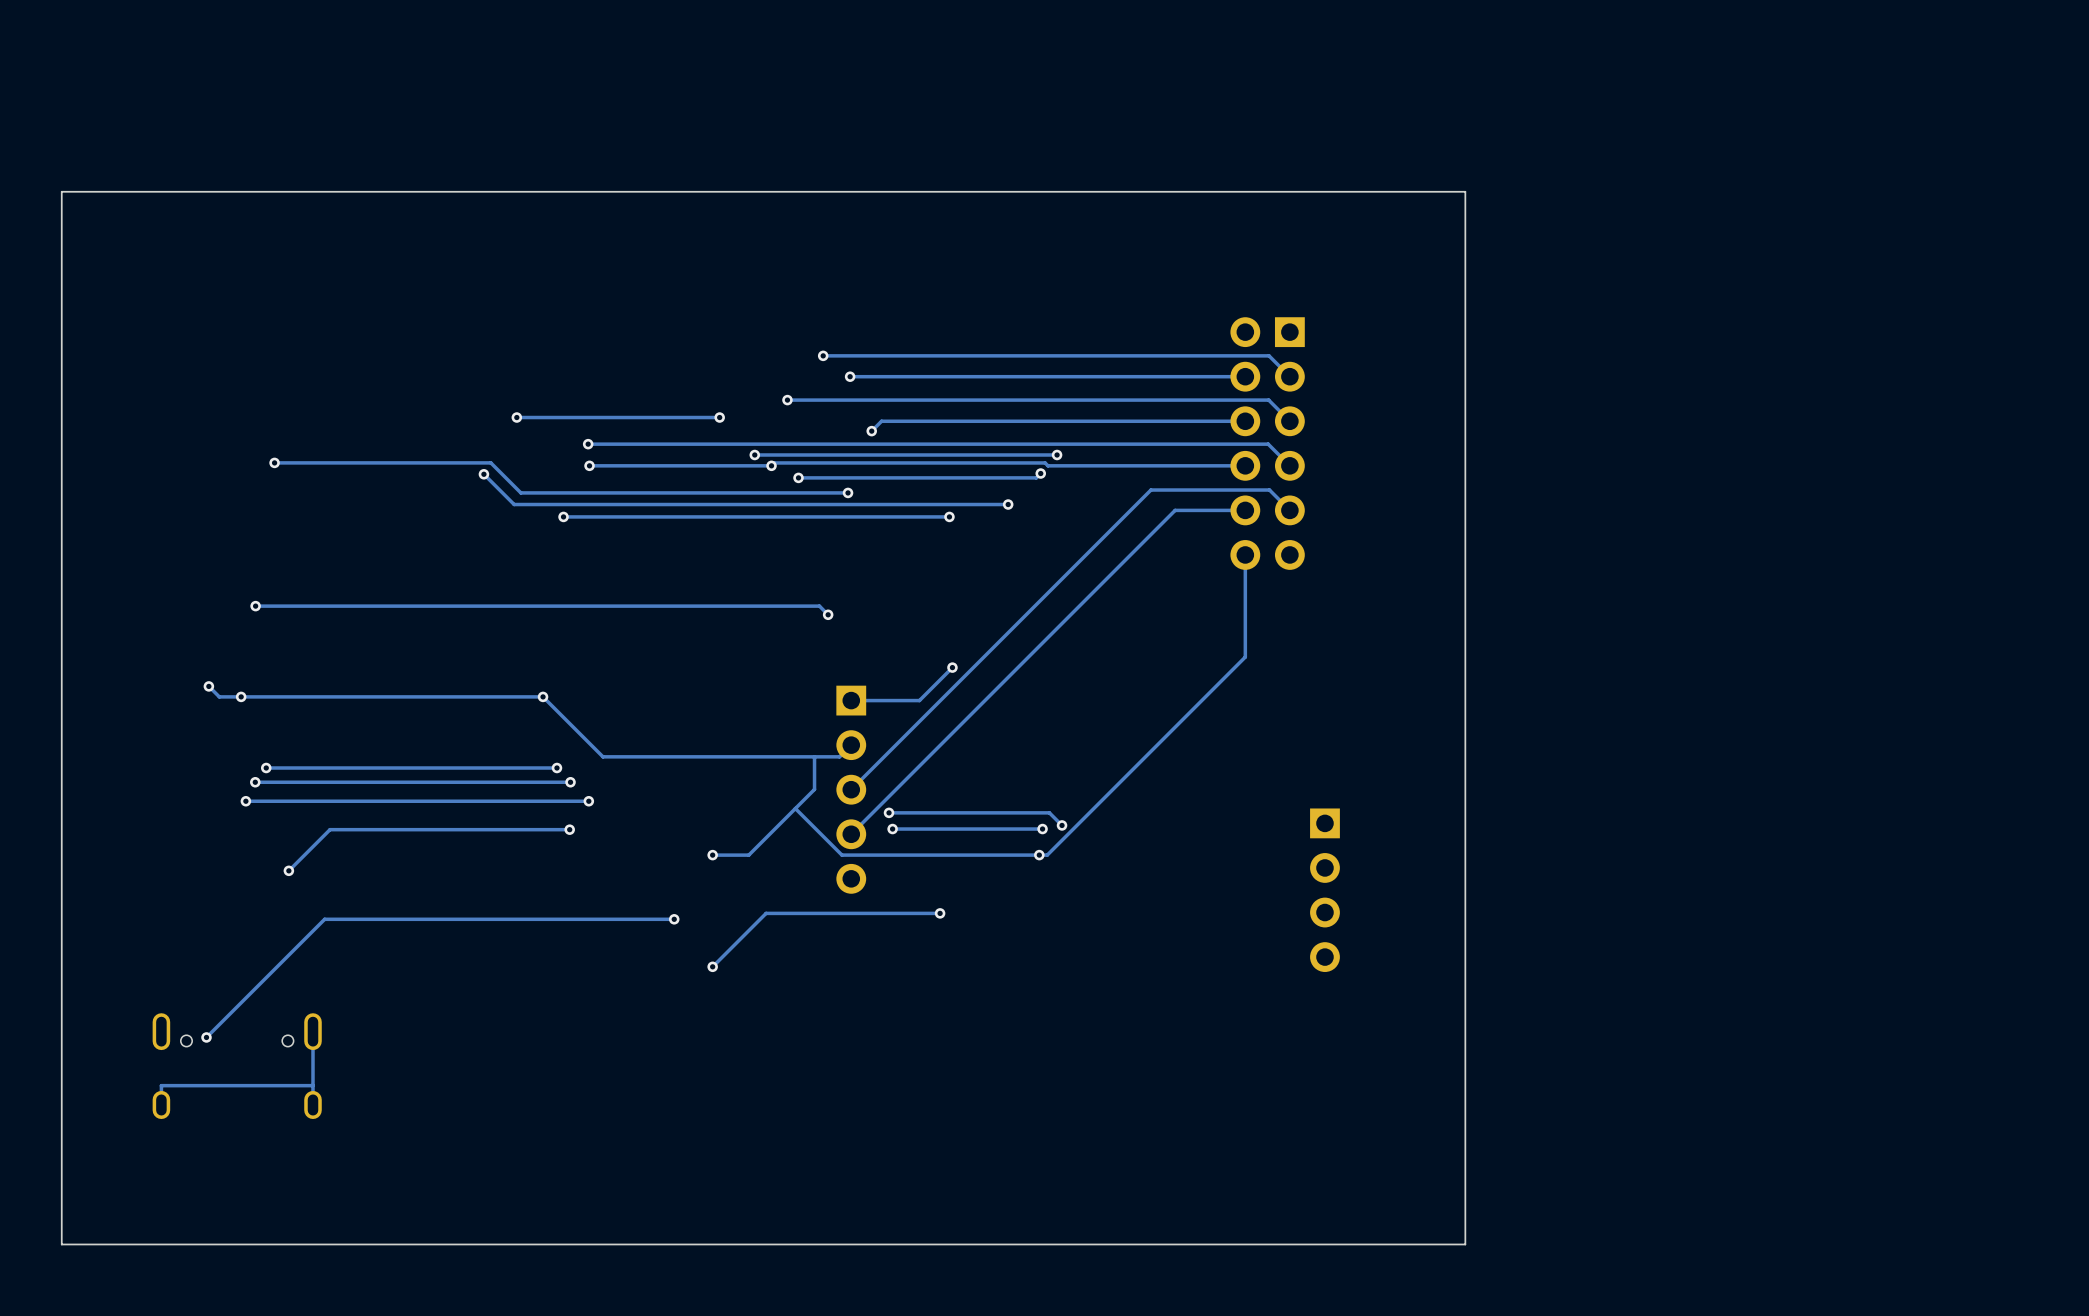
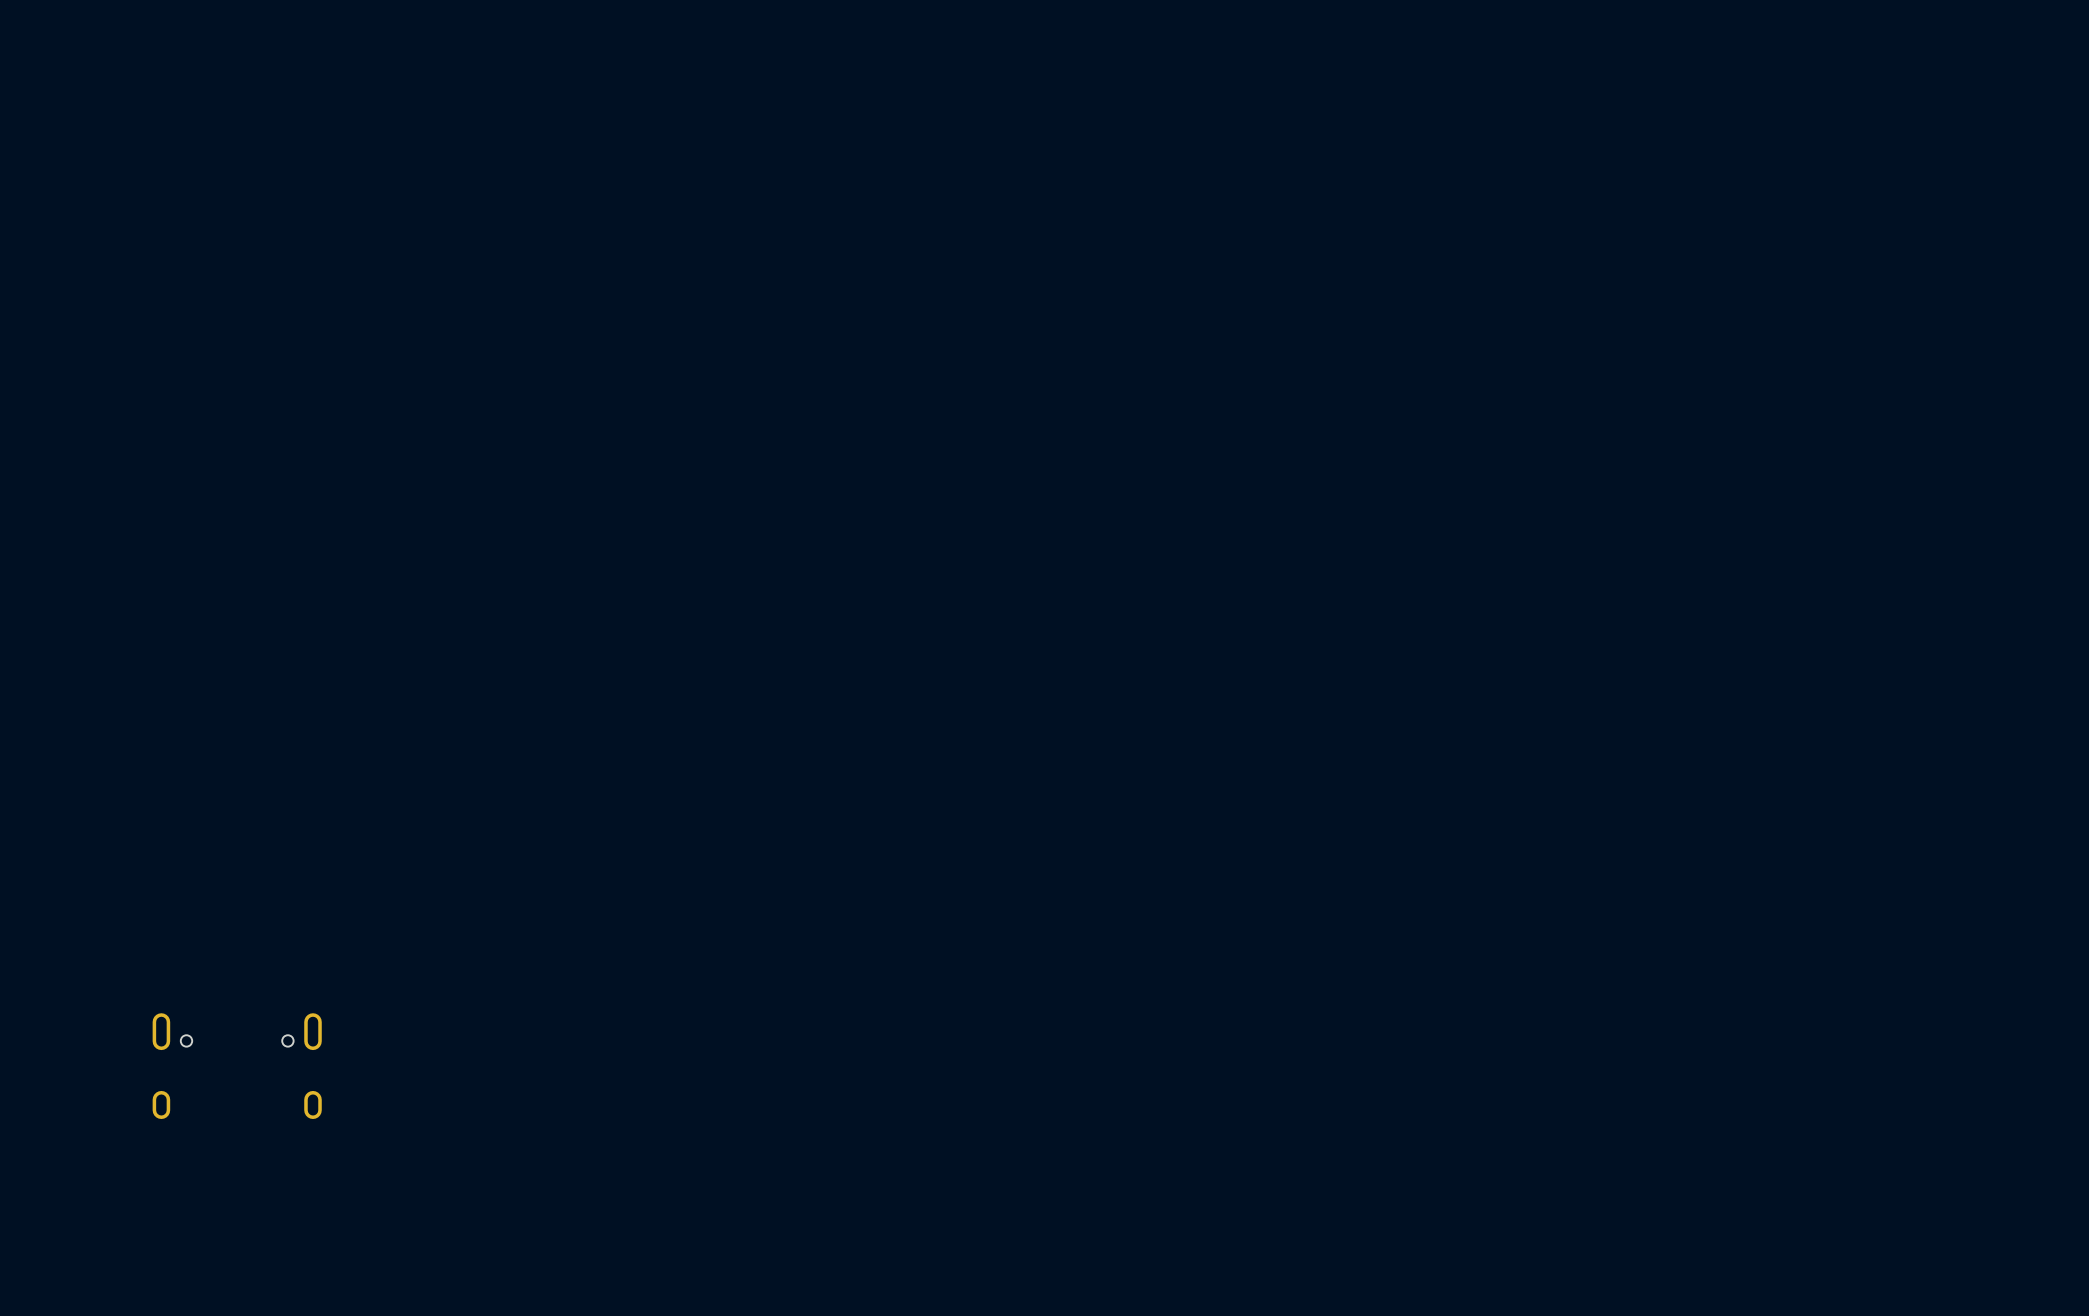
board edge: (1465, 191) (1465, 1244) (61, 1244) (61, 191) (1465, 191) -> none
track: (823, 355) (1269, 355) (1289, 376) -> none
via: (823, 355) -> none
via: (850, 376) -> none
track: (1245, 376) (850, 376) -> none
track: (787, 400) (1268, 400) (1289, 421) -> none
via: (787, 400) -> none
via: (516, 417) -> none
track: (719, 417) (516, 417) -> none
via: (719, 417) -> none
track: (1245, 421) (881, 421) (871, 431) -> none
via: (871, 431) -> none
part: (1267, 443) -> none
track: (588, 444) (1268, 444) (1289, 465) -> none
via: (588, 444) -> none
via: (754, 454) -> none
track: (1057, 454) (754, 454) -> none
via: (1057, 454) -> none
track: (274, 462) (490, 462) (520, 492) (848, 492) -> none
via: (274, 462) -> none
via: (589, 465) -> none
via: (771, 465) -> none
track: (1245, 465) (1047, 465) (1045, 462) (774, 462) (771, 465) (589, 465) -> none
track: (1040, 473) (1036, 477) (798, 477) -> none
via: (1040, 473) -> none
track: (483, 474) (514, 504) (1008, 504) -> none
via: (483, 474) -> none
via: (798, 477) -> none
via: (848, 492) -> none
via: (1008, 504) -> none
track: (1245, 510) (1175, 510) (851, 834) -> none
track: (1289, 510) (1269, 490) (1150, 490) (851, 789) -> none
via: (563, 516) -> none
track: (949, 516) (563, 516) -> none
via: (949, 516) -> none
track: (1245, 554) (1245, 657) (1047, 855) (841, 855) (795, 808) -> none
track: (255, 606) (819, 606) (828, 614) -> none
via: (255, 606) -> none
via: (828, 614) -> none
track: (952, 667) (919, 700) (851, 700) -> none
via: (952, 667) -> none
track: (208, 686) (219, 696) (543, 696) (602, 756) (839, 756) (851, 745) -> none
via: (208, 686) -> none
via: (241, 696) -> none
via: (543, 696) -> none
track: (814, 756) (814, 789) (748, 855) (712, 855) -> none
via: (266, 768) -> none
track: (556, 768) (266, 768) -> none
via: (556, 768) -> none
via: (255, 782) -> none
track: (570, 782) (255, 782) -> none
via: (570, 782) -> none
part: (851, 789) -> none
via: (245, 801) -> none
track: (588, 801) (245, 801) -> none
via: (588, 801) -> none
track: (889, 812) (1049, 812) (1062, 825) -> none
via: (889, 812) -> none
via: (1062, 825) -> none
track: (569, 829) (330, 829) (288, 870) -> none
via: (569, 829) -> none
via: (892, 829) -> none
track: (1042, 829) (892, 829) -> none
via: (1042, 829) -> none
via: (712, 855) -> none
via: (1039, 855) -> none
via: (288, 870) -> none
part: (1324, 890) -> none
track: (940, 913) (766, 913) (712, 966) -> none
via: (940, 913) -> none
track: (674, 919) (324, 919) (206, 1037) -> none
via: (674, 919) -> none
via: (712, 966) -> none
track: (312, 1031) (312, 1104) -> none
via: (206, 1037) -> none
track: (312, 1085) (161, 1085) (161, 1104) -> none

